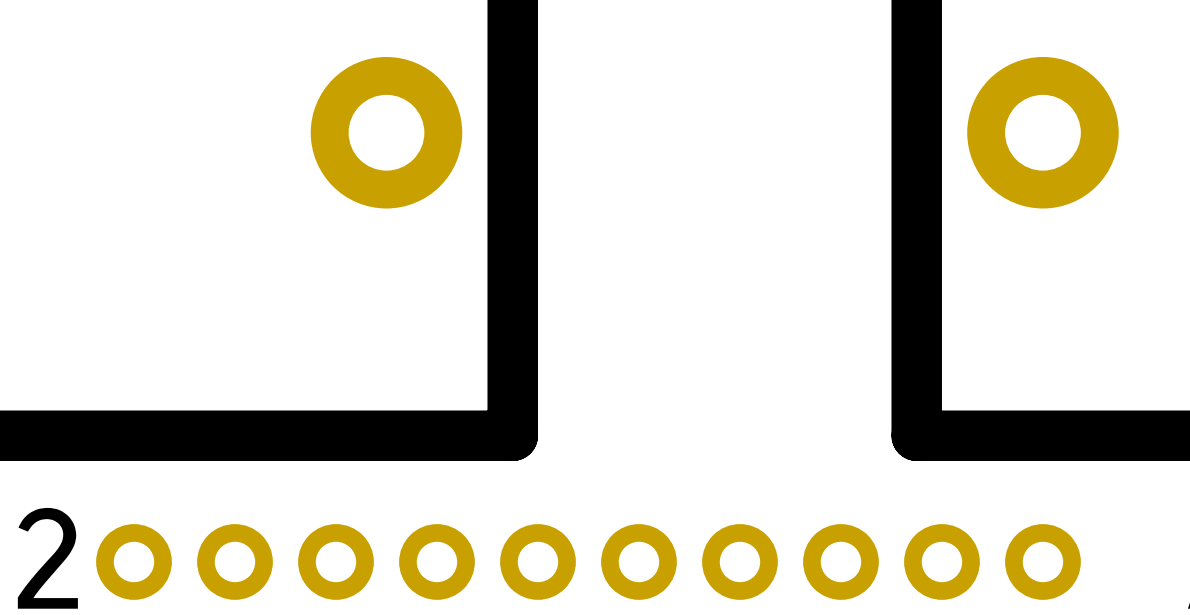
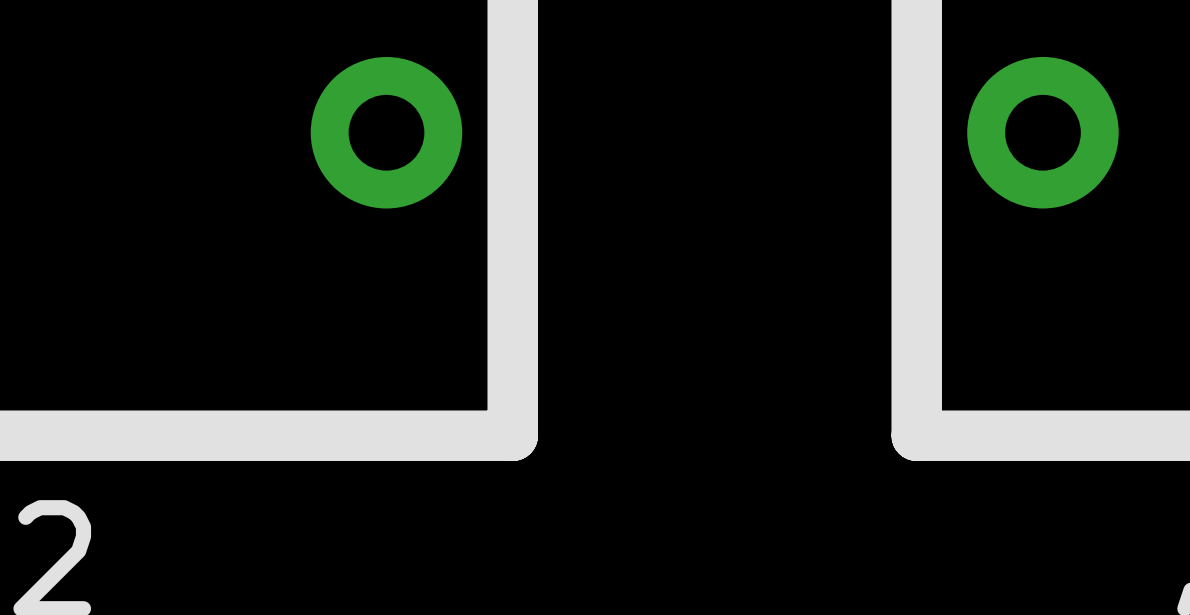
part: (133, 561) -> none
part: (234, 561) -> none
part: (335, 561) -> none
part: (436, 561) -> none
part: (537, 561) -> none
part: (638, 561) -> none
part: (739, 561) -> none
part: (840, 561) -> none
part: (941, 561) -> none
part: (1042, 561) -> none

